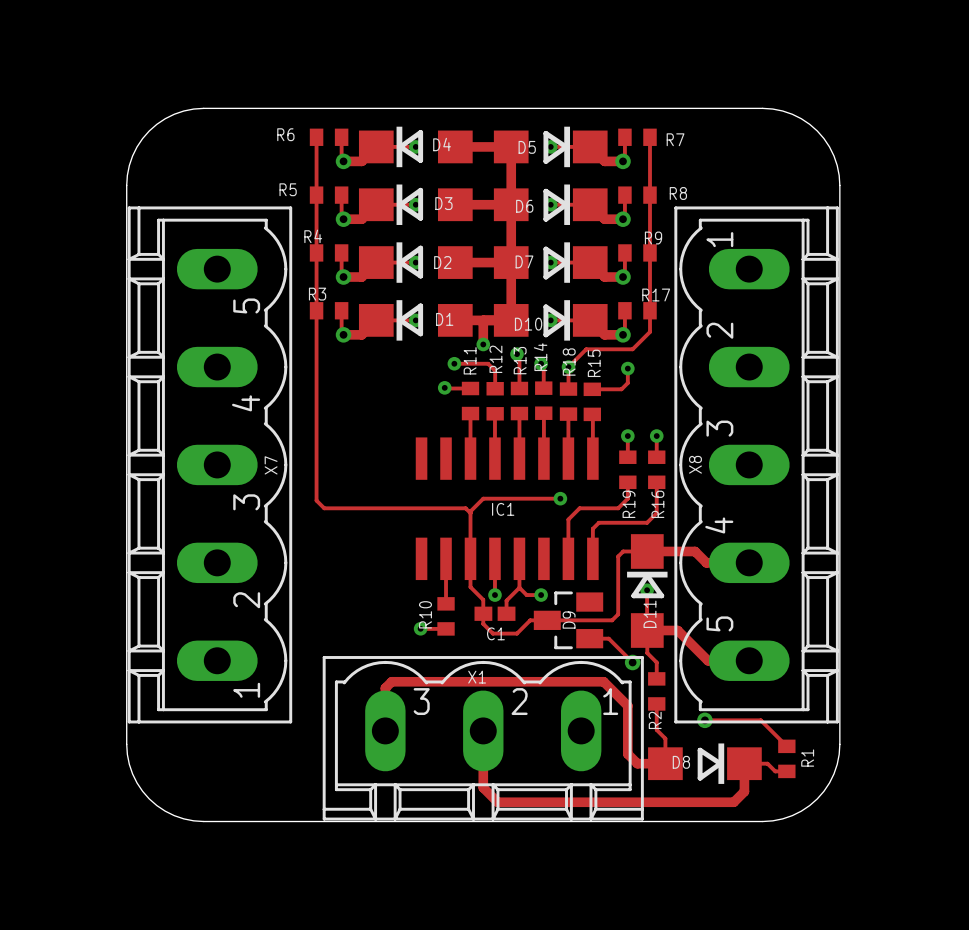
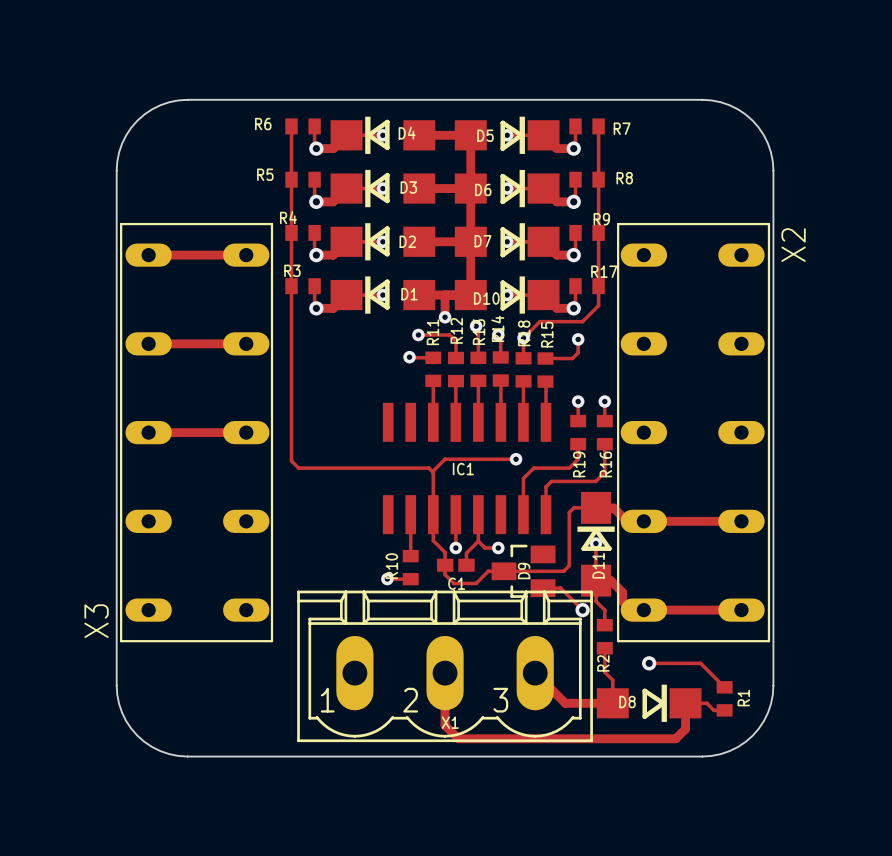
track: none -> (148, 255) (246, 255)
track: none -> (148, 343) (246, 343)
X7: (209, 464) -> none
X8: (756, 464) -> none
track: none -> (148, 432) (246, 432)
X3: none -> (196, 432)
X2: none -> (693, 432)
track: (647, 551) (695, 551) (706, 562) (749, 562) -> (596, 508) (613, 508) (626, 521) (741, 521)
track: (663, 630) (677, 630) (708, 660) (749, 660) -> (610, 580) (622, 592) (622, 601) (631, 610) (741, 610)
X1 footprint: [322, 656, 644, 821] -> [297, 590, 593, 743]
X1 name position: X1 (477, 677) -> X1 (450, 722)
track: (385, 730) (385, 688) (391, 681) (603, 681) (627, 705) (627, 754) (637, 763) -> (535, 673) (565, 703) (587, 703)

